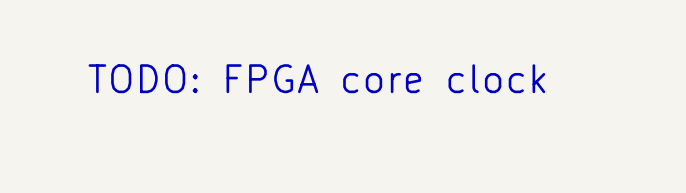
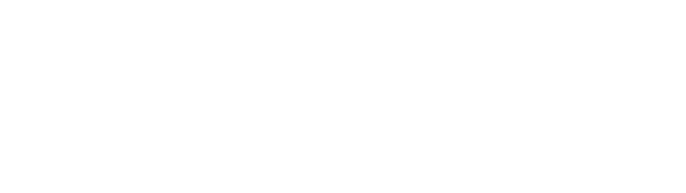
text: TODO: FPGA core clock (316, 78) -> none

